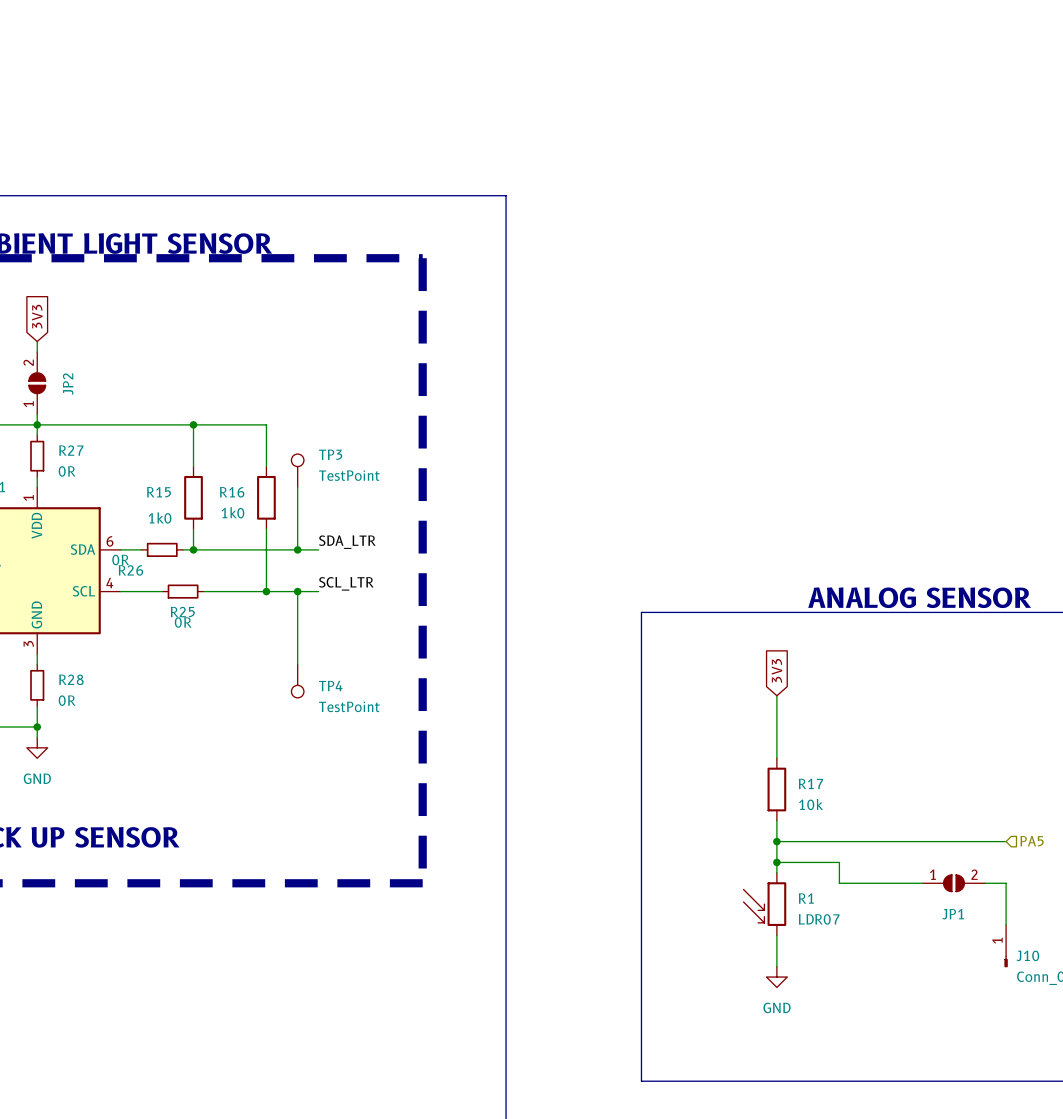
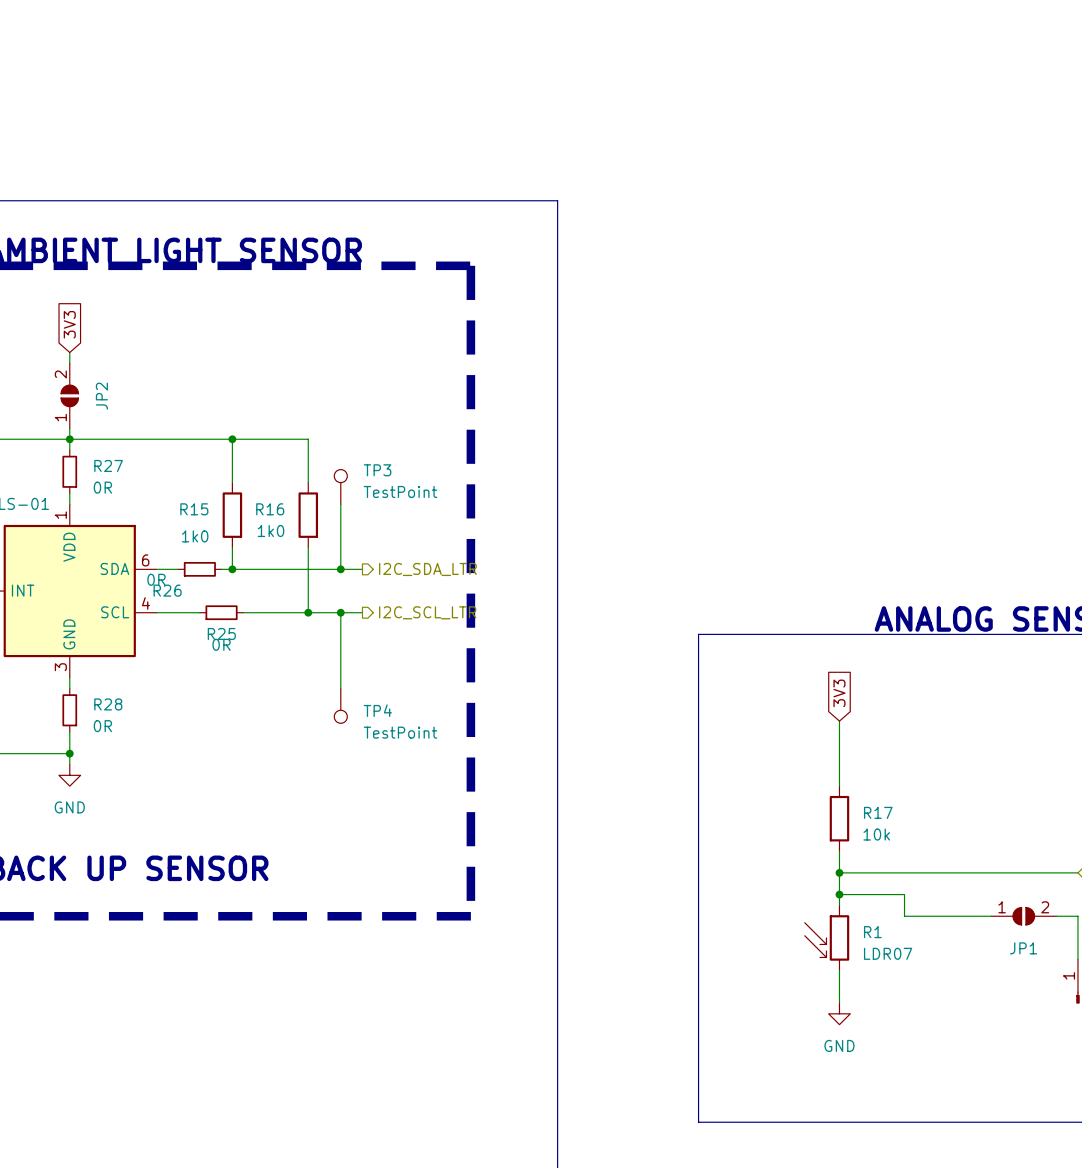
label: SDA_LTR (347, 542) -> none
hierarchical label: none -> I2C_SDA_LTR (427, 569)
label: SCL_LTR (346, 583) -> none
hierarchical label: none -> I2C_SCL_LTR (427, 612)

